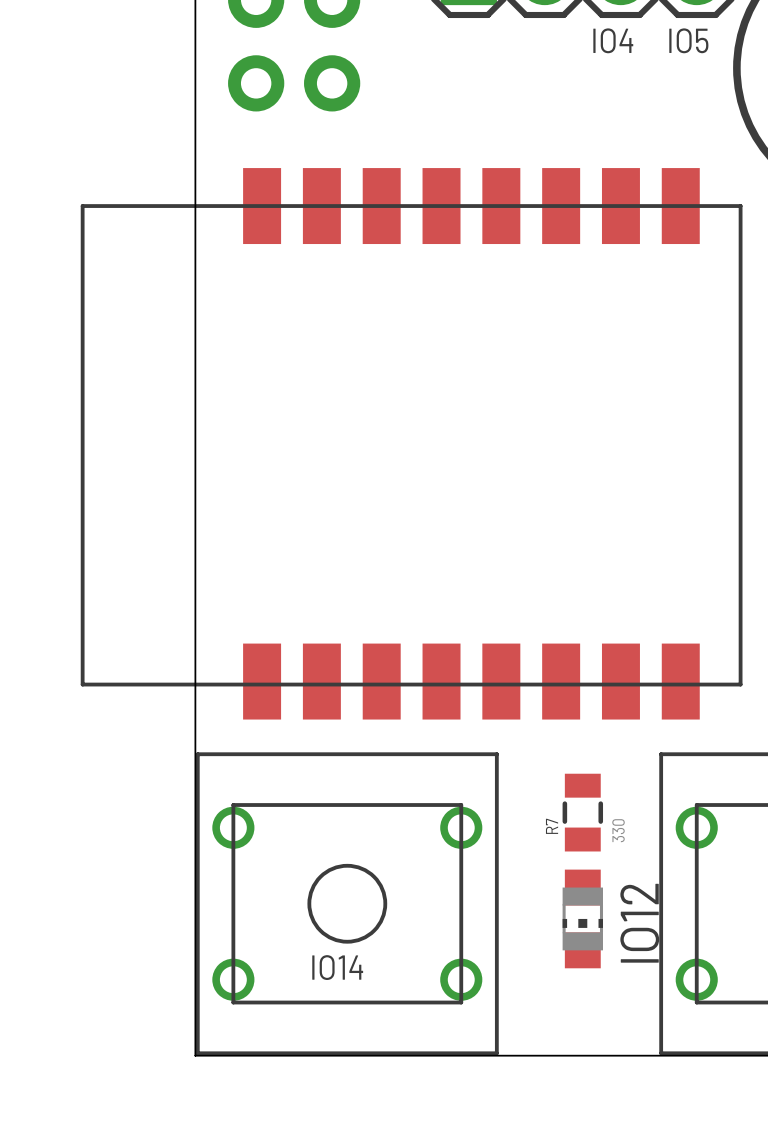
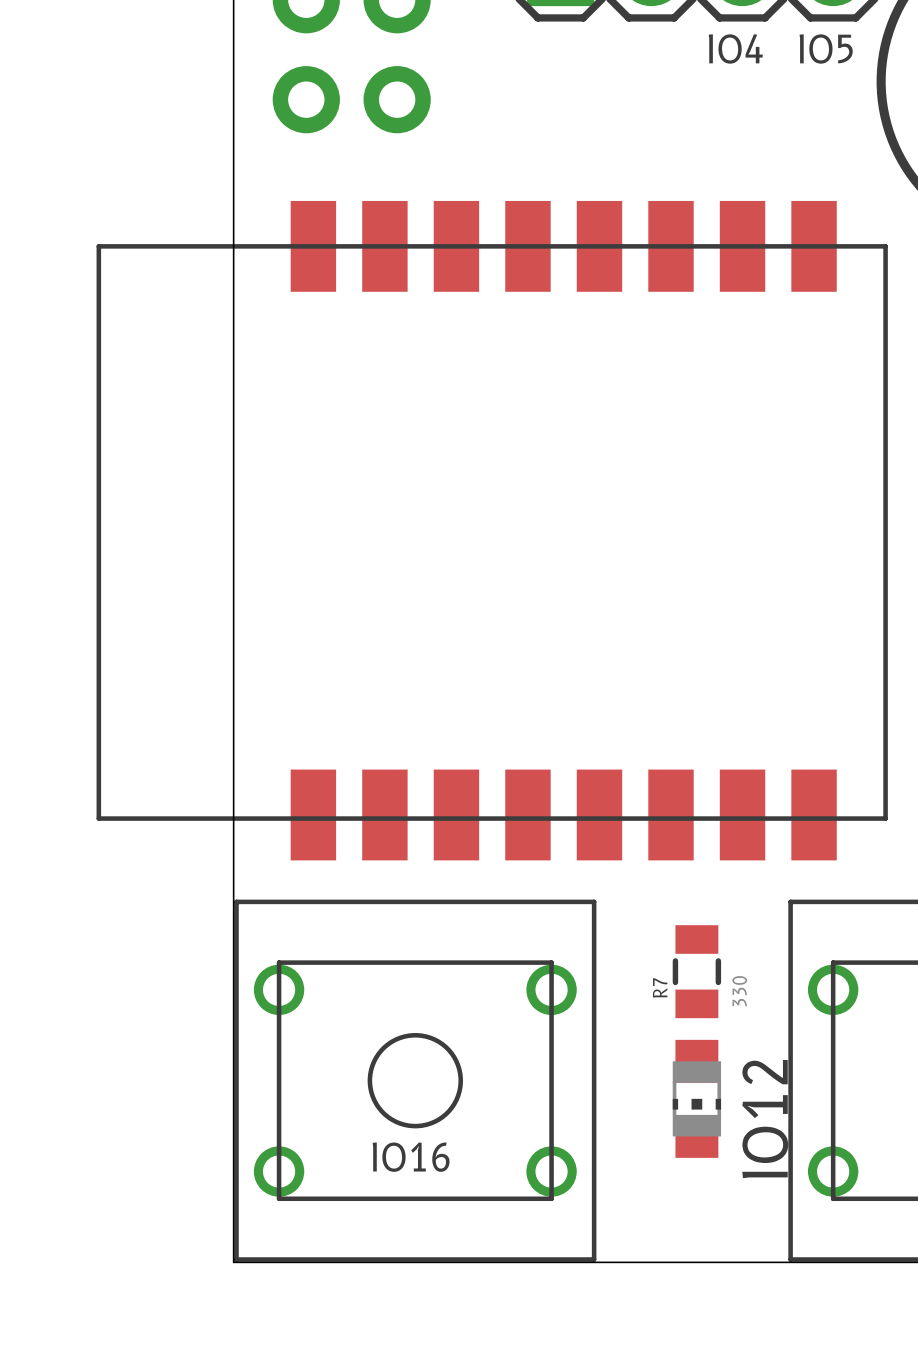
text: IO14 (337, 967) -> IO16 (411, 1157)

